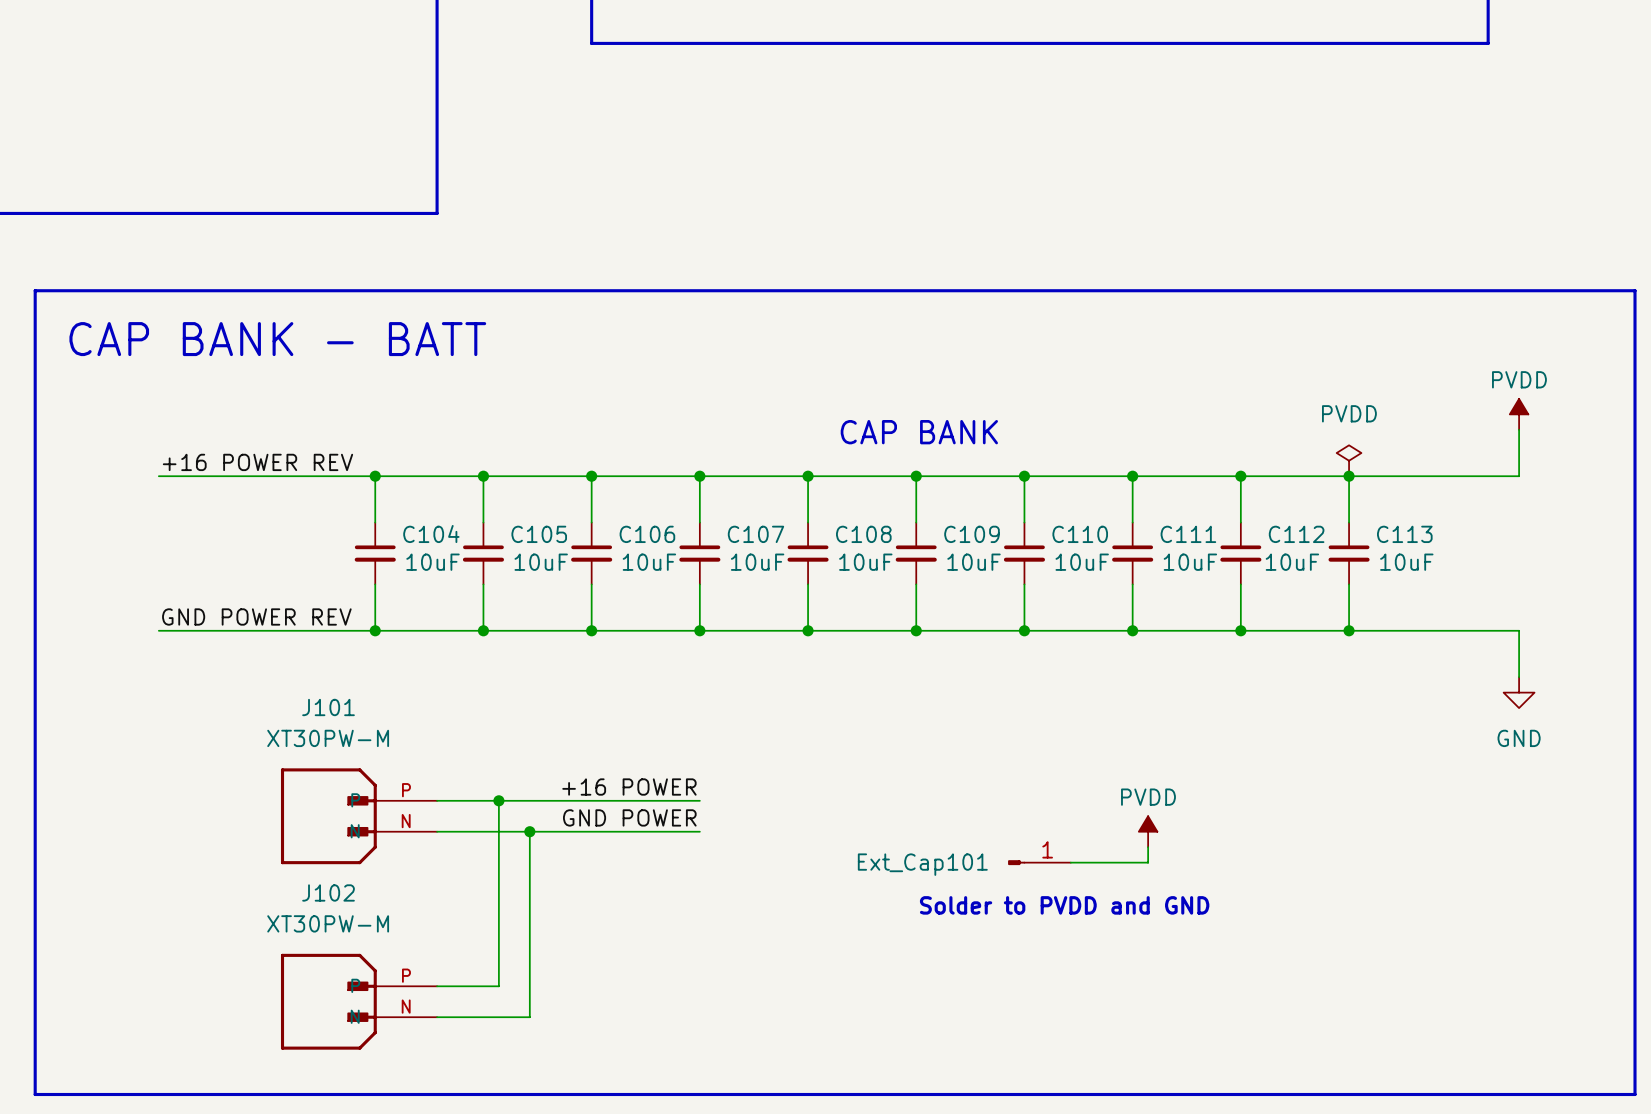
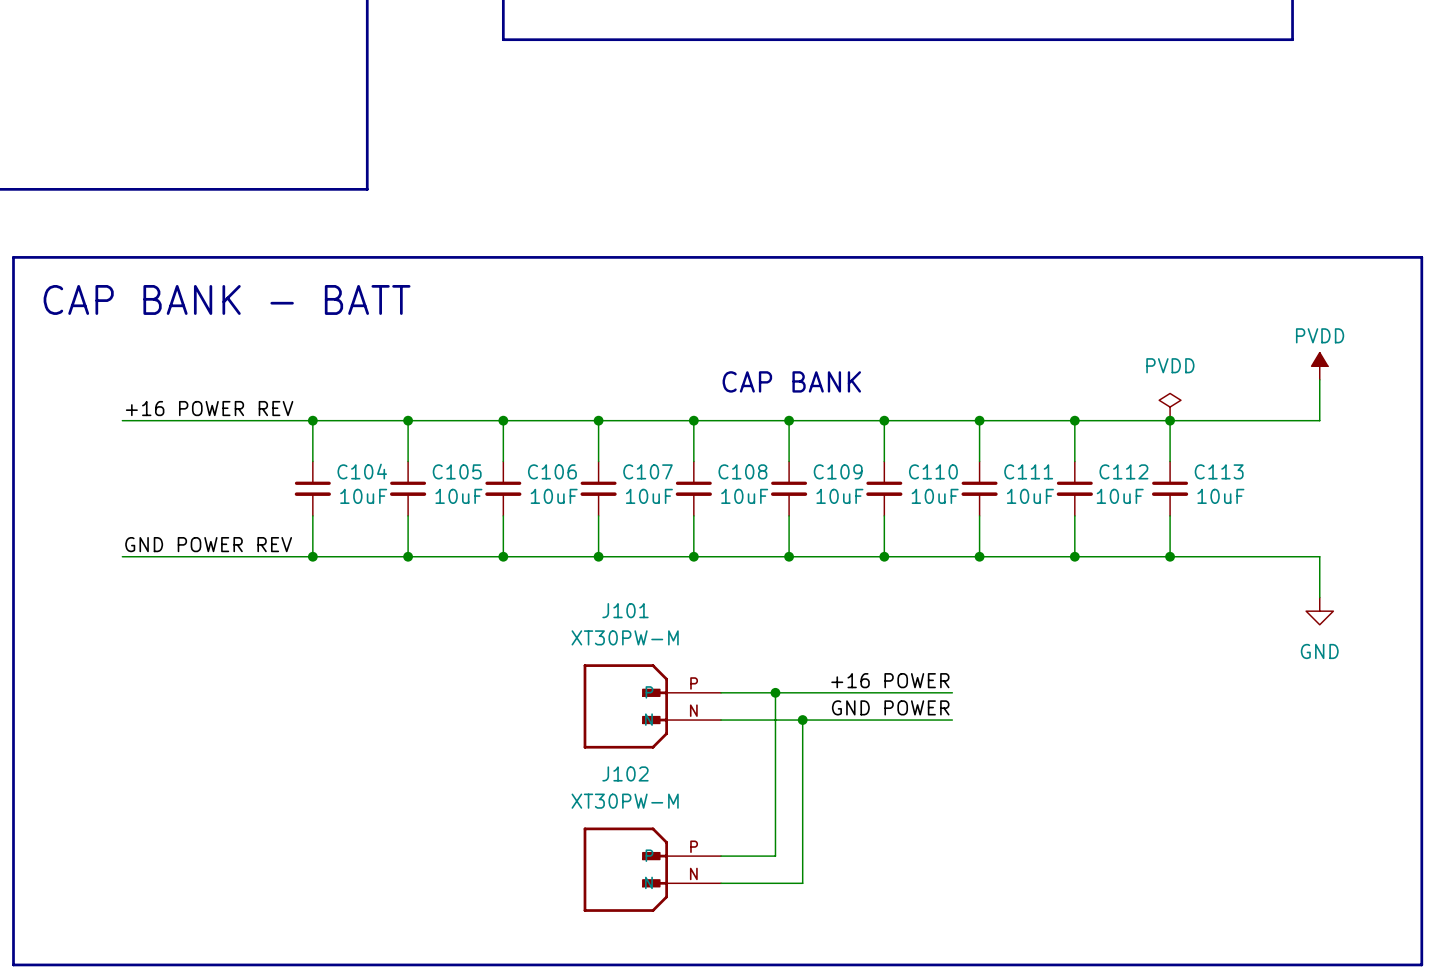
label: none -> +16 POWER (890, 680)
wire: none -> (721, 692) (952, 692)
wire: none -> (775, 692) (775, 856) (721, 856)
junction: none -> (775, 692)
label: +16 POWER (629, 787) -> none
wire: (437, 800) (699, 800) -> none
wire: (498, 800) (498, 986) (437, 986) -> none
junction: (498, 800) -> none
label: none -> GND POWER (890, 707)
J101 position: (359, 816) -> (652, 706)
wire: none -> (721, 720) (952, 720)
wire: none -> (802, 720) (802, 883) (721, 883)
junction: none -> (802, 720)
label: GND POWER (629, 817) -> none
wire: (437, 831) (699, 831) -> none
wire: (529, 831) (529, 1017) (437, 1017) -> none
junction: (529, 831) -> none
power symbol: PVDD (1148, 831) -> none
wire: (1148, 847) (1148, 862) (1070, 862) -> none
Ext_Cap101: (1039, 862) -> none
text: Solder to PVDD and GND (1064, 905) -> none
J102 position: (359, 1001) -> (652, 869)

